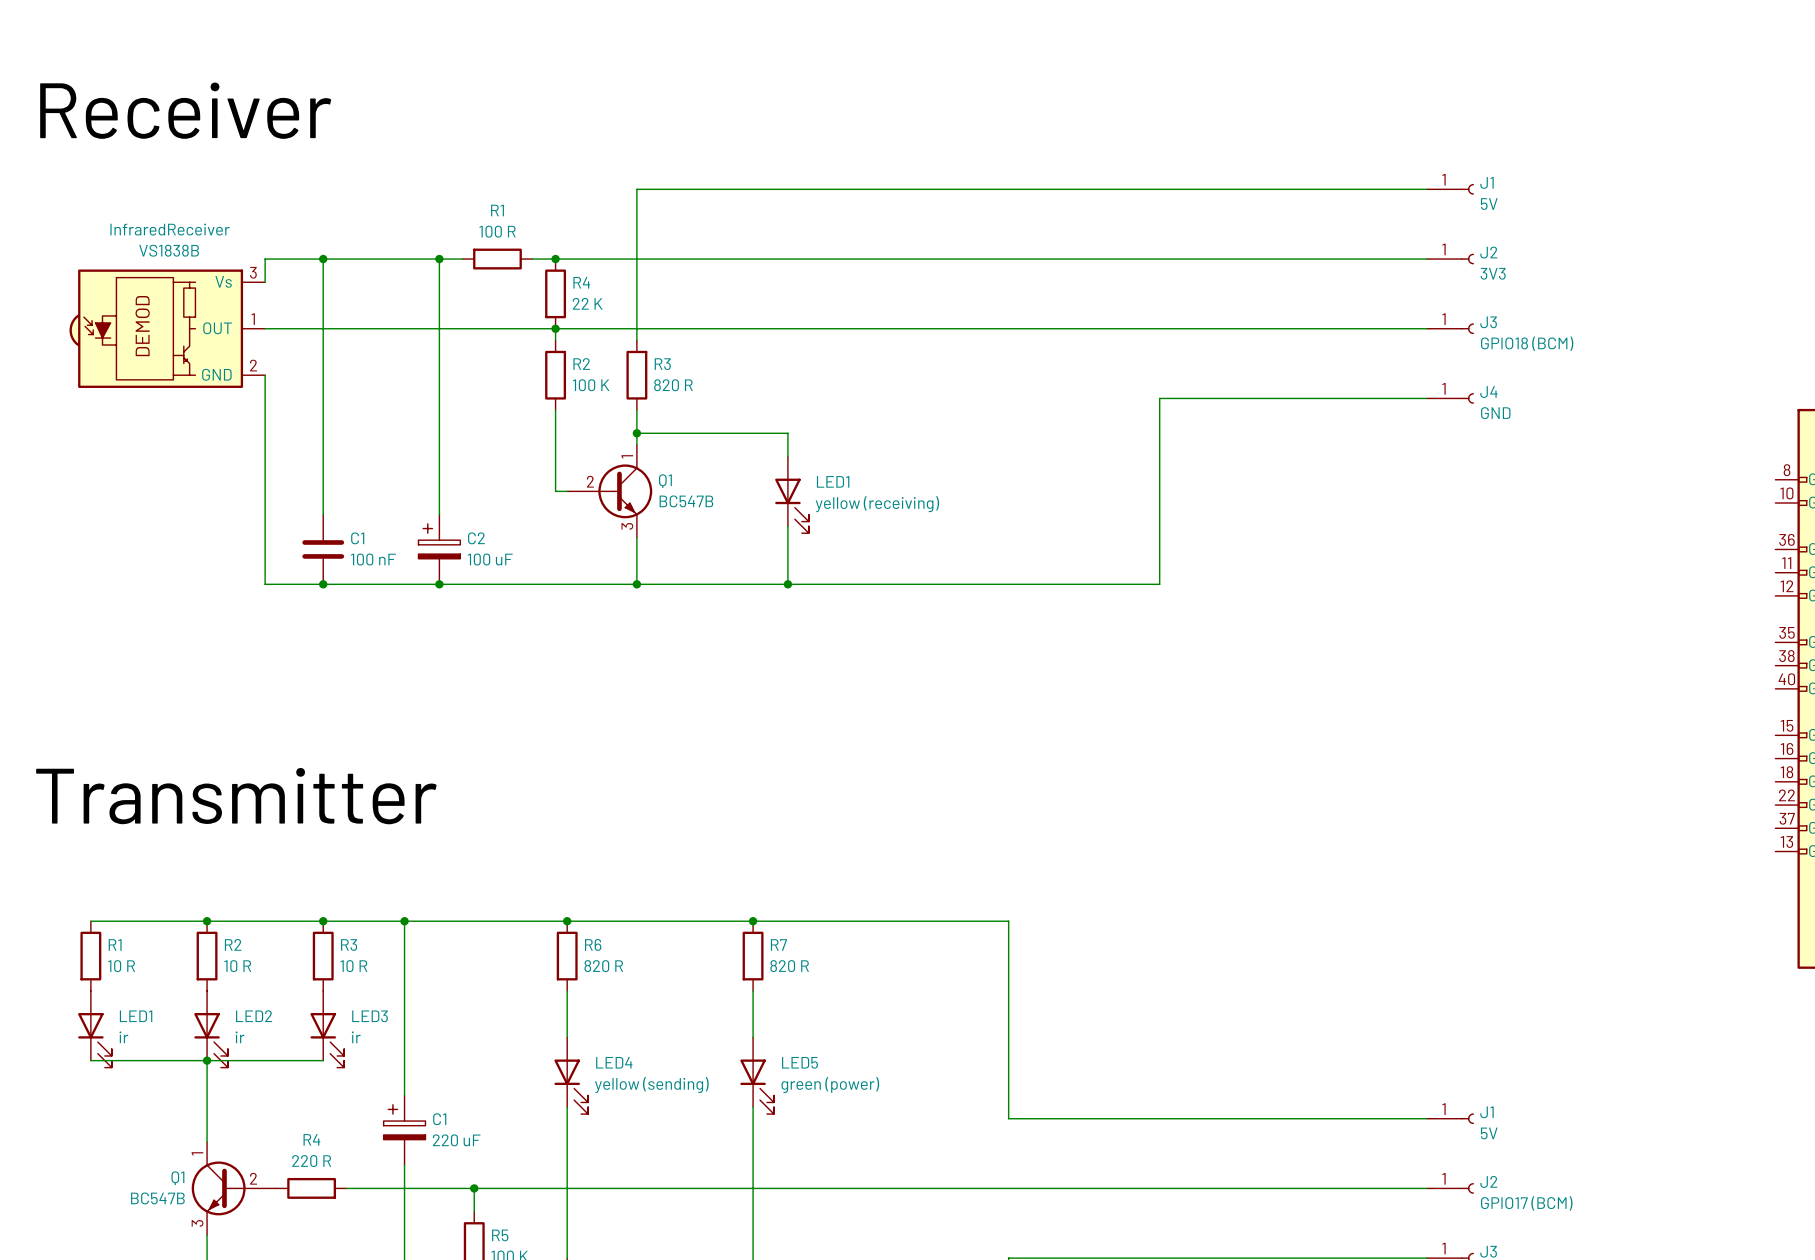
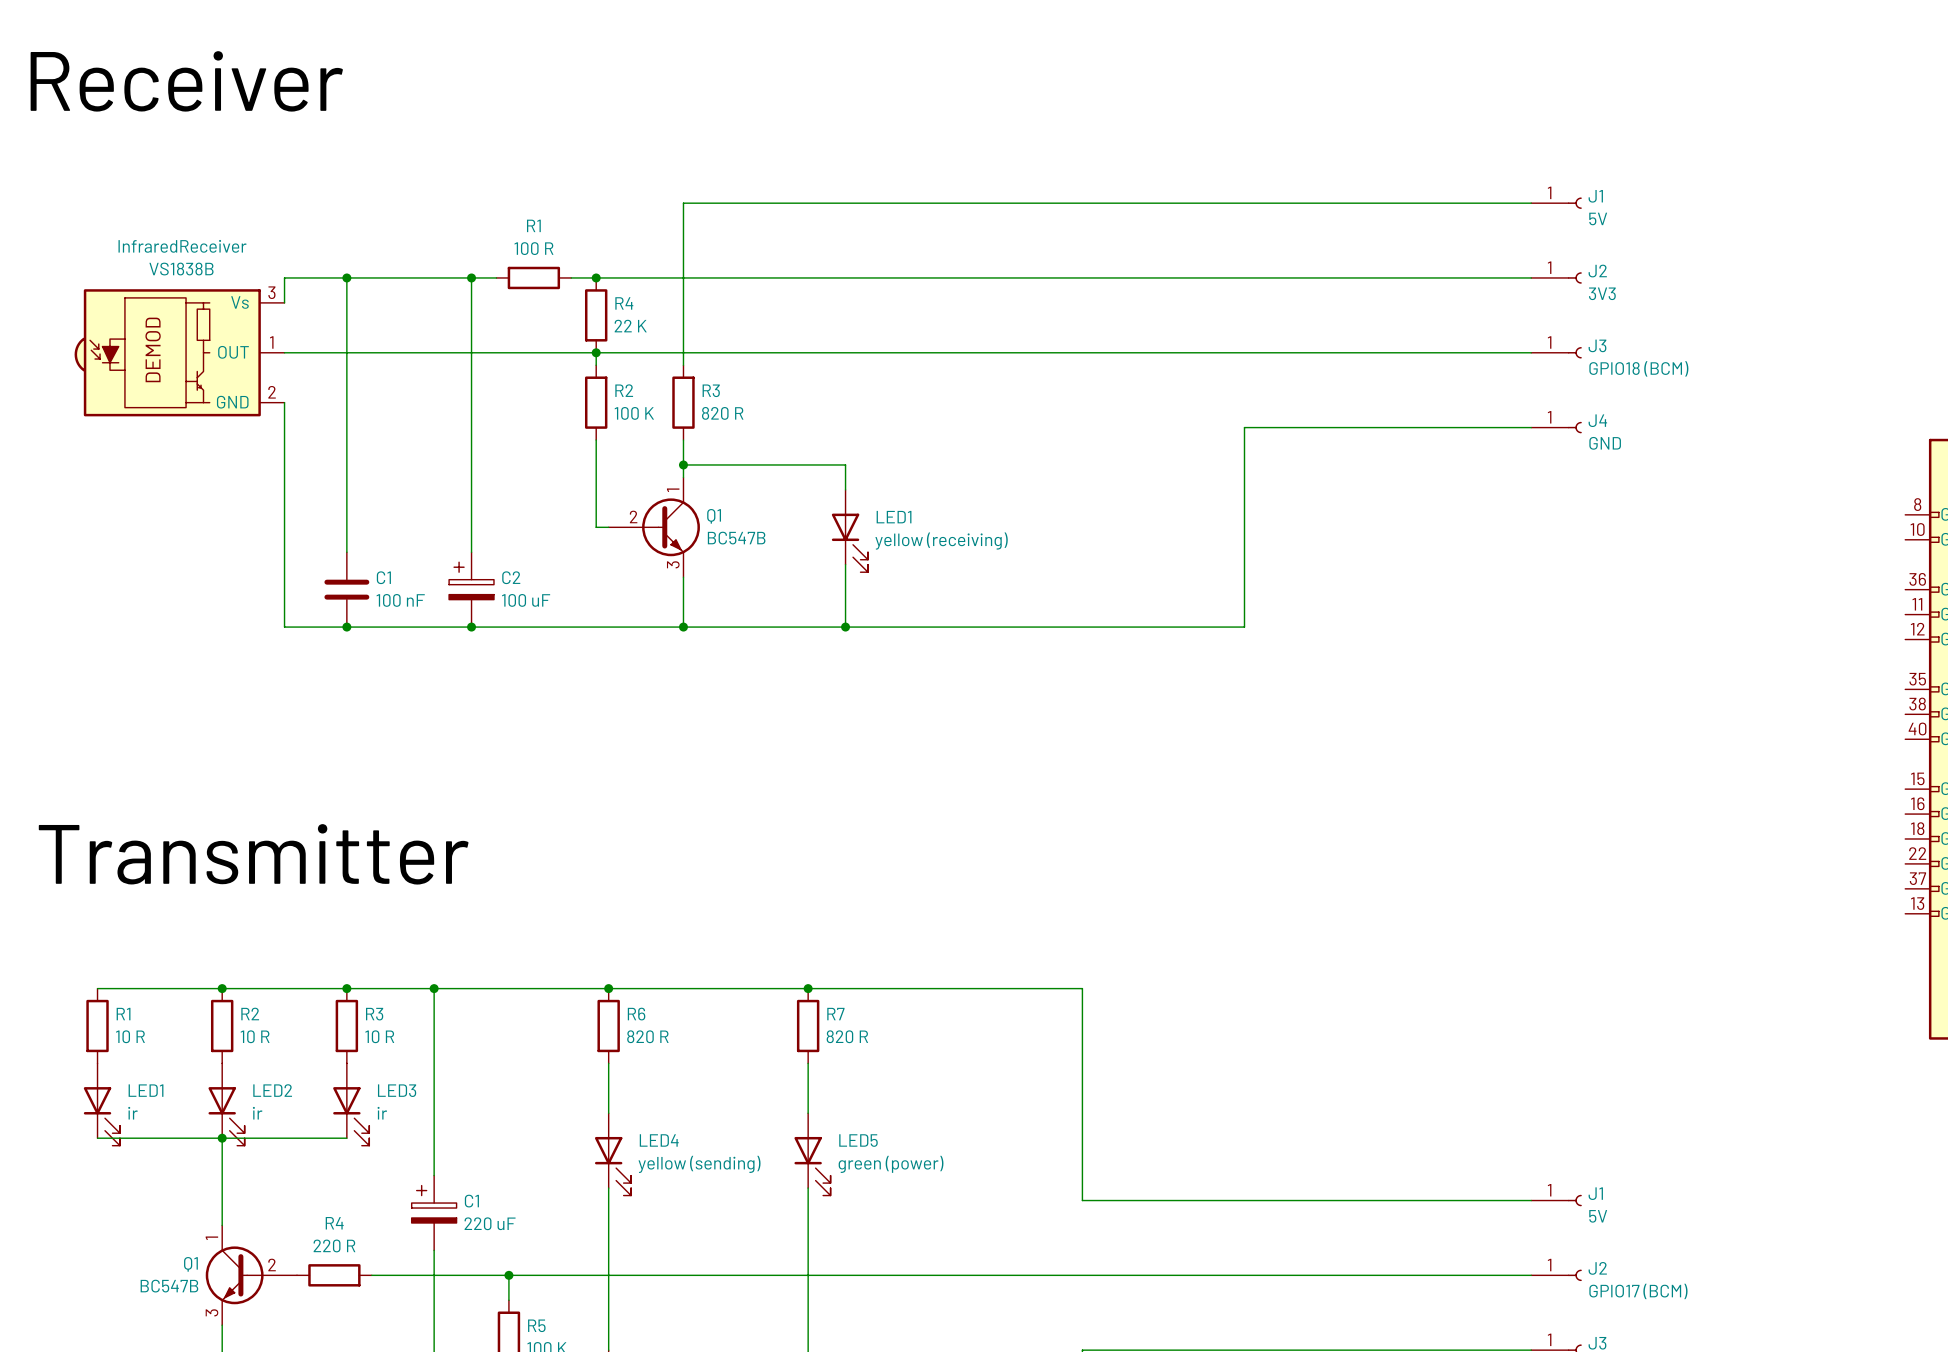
label position: Receiver (185, 110) -> Receiver (186, 81)

